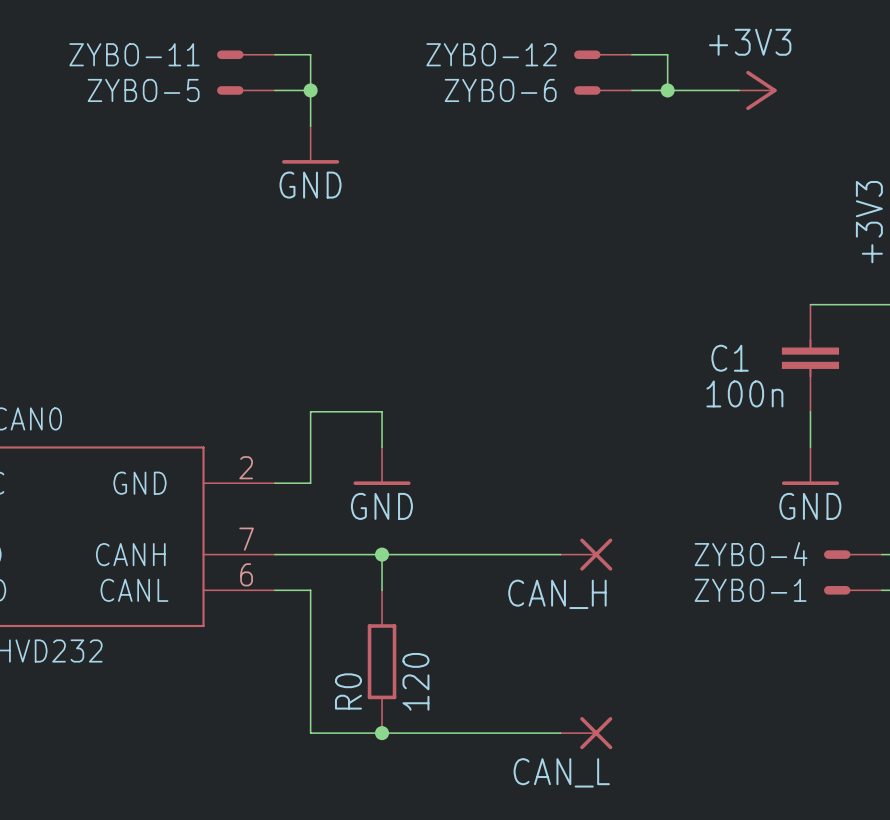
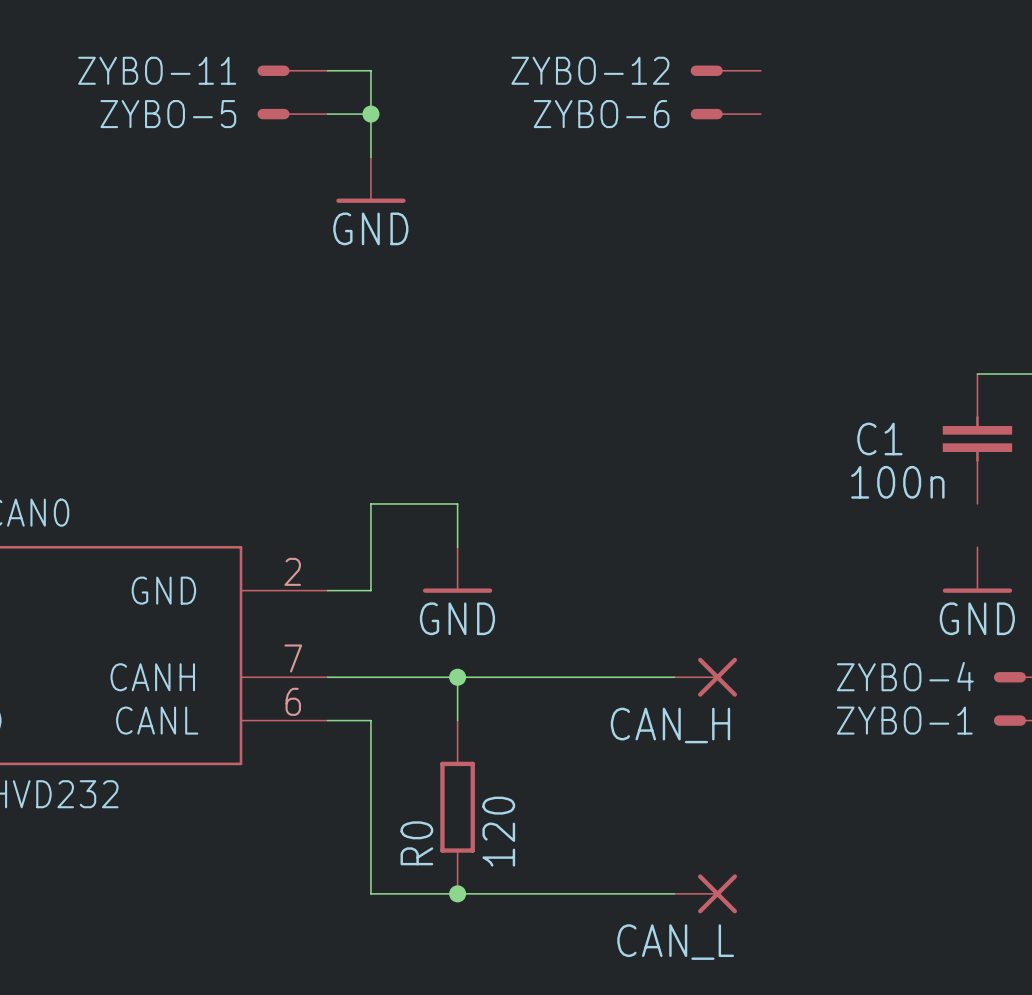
wire: (631, 54) (667, 54) (667, 90) -> none
wire: (631, 90) (739, 90) -> none
junction: (667, 90) -> none
power symbol: +3V3 (757, 90) -> none
wire: (810, 411) (810, 447) -> none

